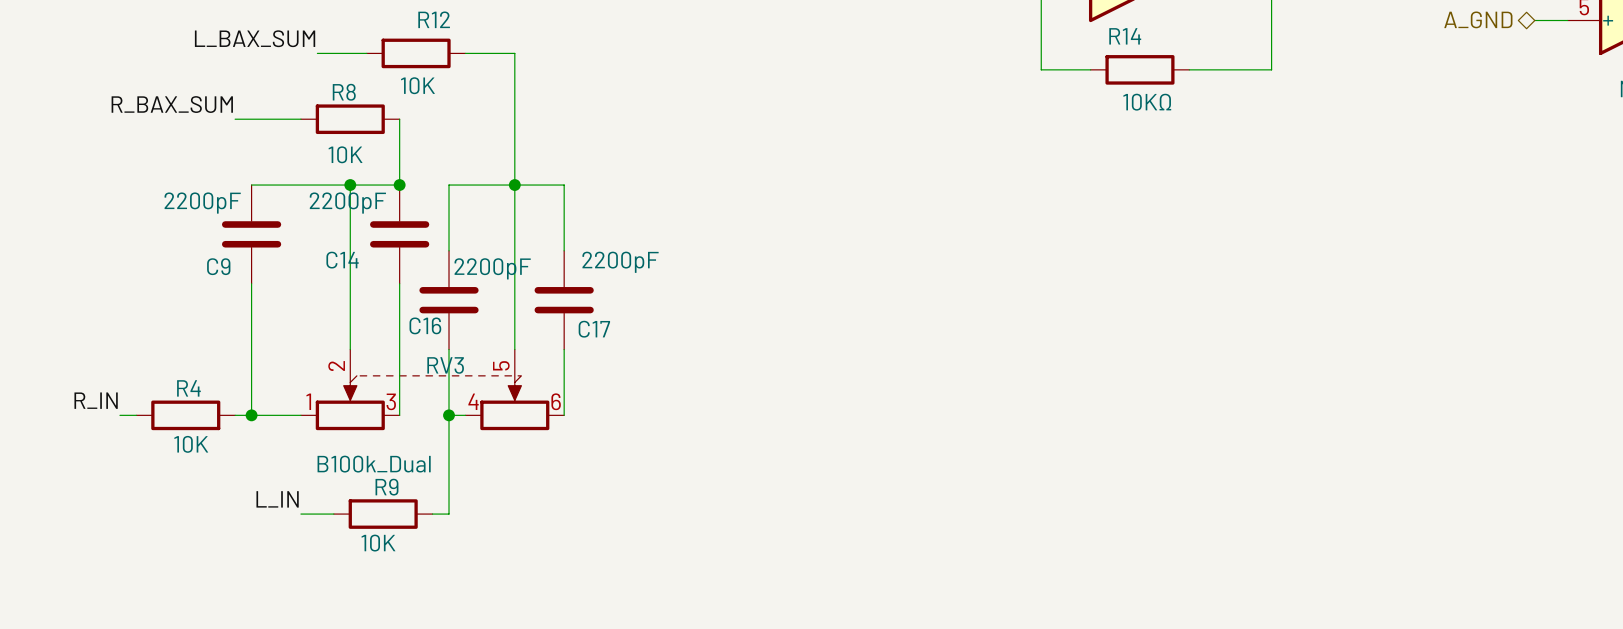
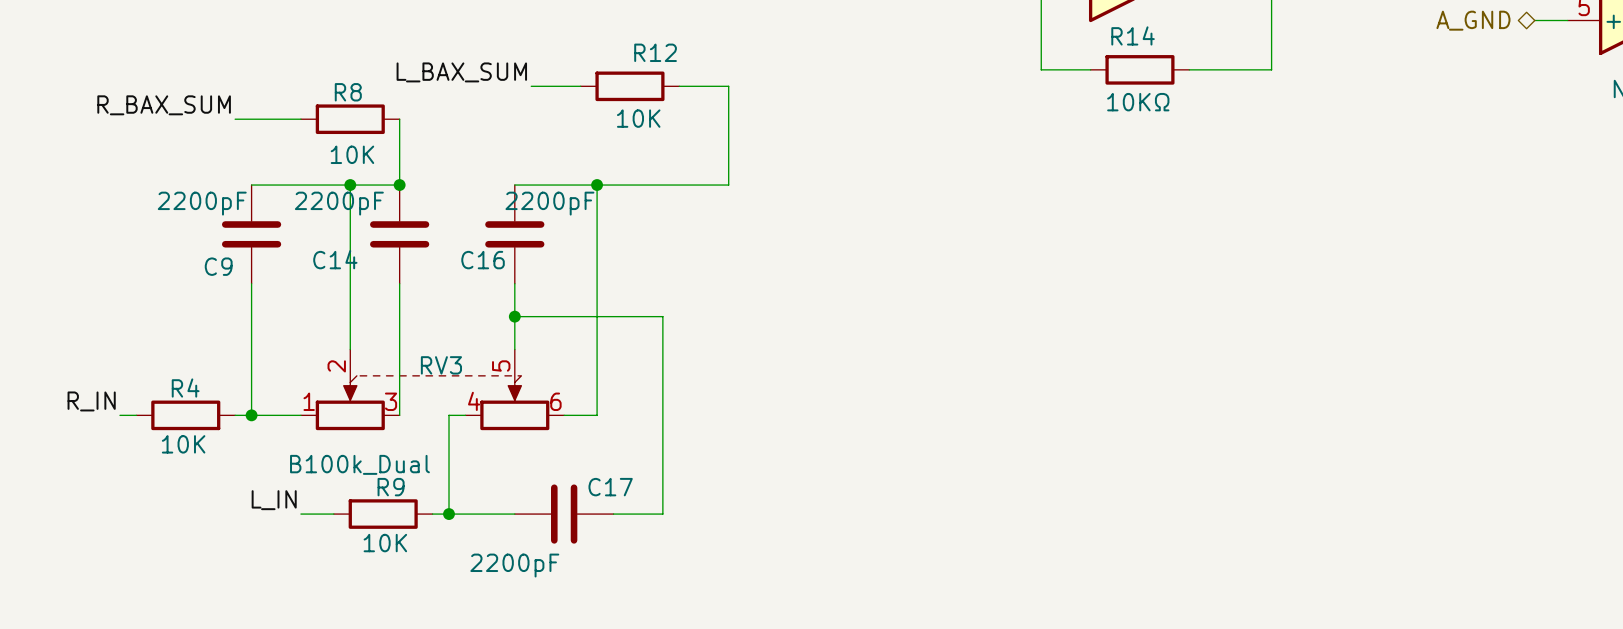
label position: L_BAX_SUM (255, 38) -> L_BAX_SUM (461, 72)
wire: (317, 53) (366, 53) -> (531, 86) (580, 86)
R12 position: (416, 53) -> (629, 86)
wire: (465, 53) (514, 53) (514, 283) -> none
wire: (514, 185) (449, 185) (449, 250) -> none
junction: (514, 185) -> none
wire: (564, 185) (564, 250) -> (564, 185) (728, 185) (728, 86) (679, 86)
junction: none -> (597, 185)
C17 value position: 2200pF (620, 262) -> 2200pF (514, 565)
C16 position: (449, 300) -> (514, 234)
C17 rotation: 0° (564, 300) -> 90° clockwise (564, 514)
C17 position: (564, 300) -> (564, 514)
wire: none -> (514, 316) (662, 316) (662, 514) (613, 514)
junction: none -> (514, 316)
C17 name position: C17 (594, 329) -> C17 (610, 487)
wire: (449, 349) (449, 415) -> none
wire: (564, 349) (564, 415) -> (597, 185) (597, 415) (564, 415)
junction: (449, 415) -> none
wire: none -> (449, 514) (514, 514)
junction: none -> (449, 514)

